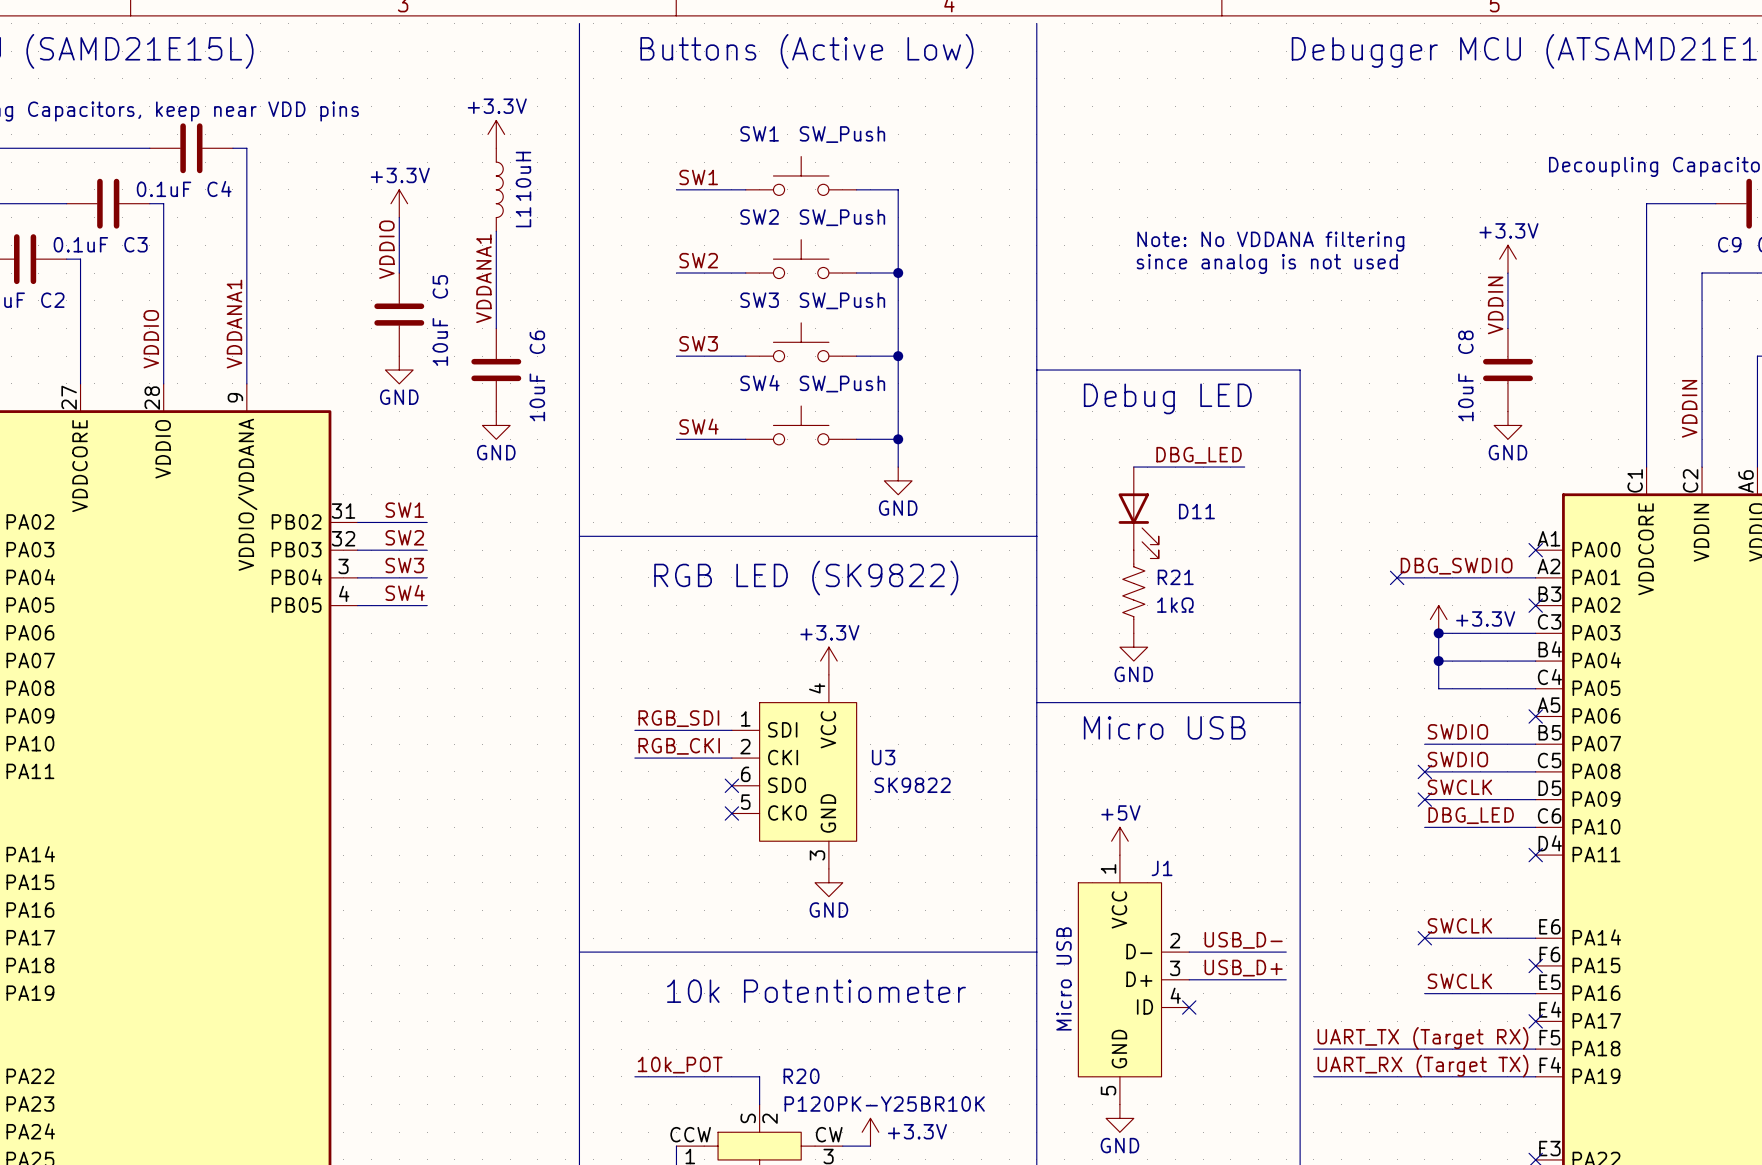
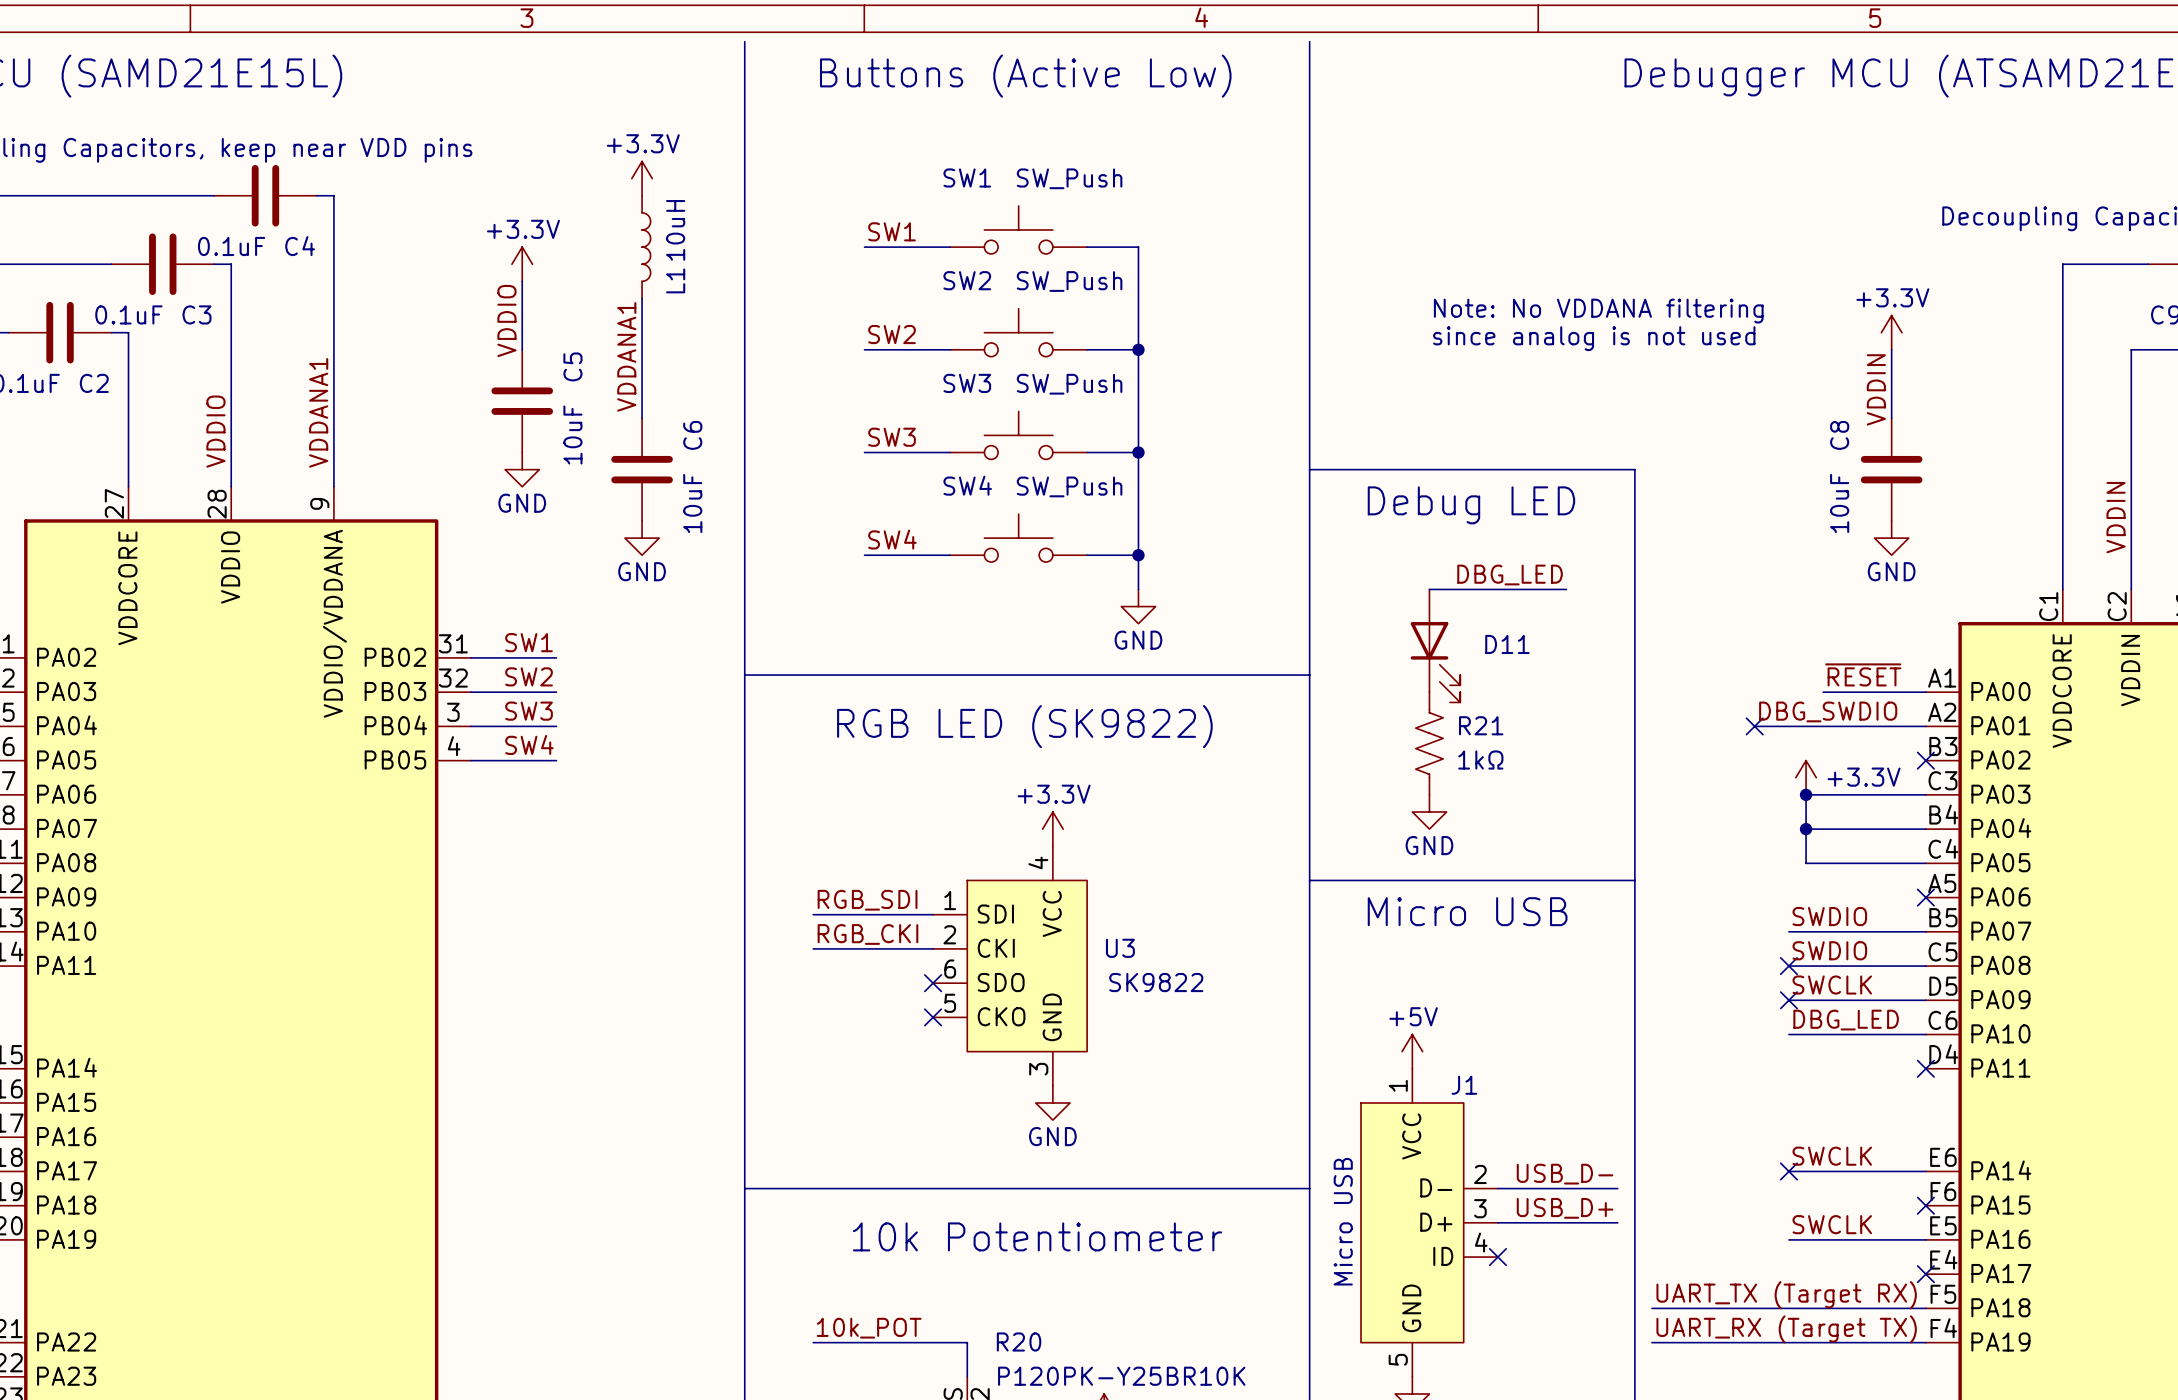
label: none -> ~{RESET} (1863, 674)
wire: none -> (1823, 692) (1925, 692)
no-connect mark: (1535, 550) -> none

